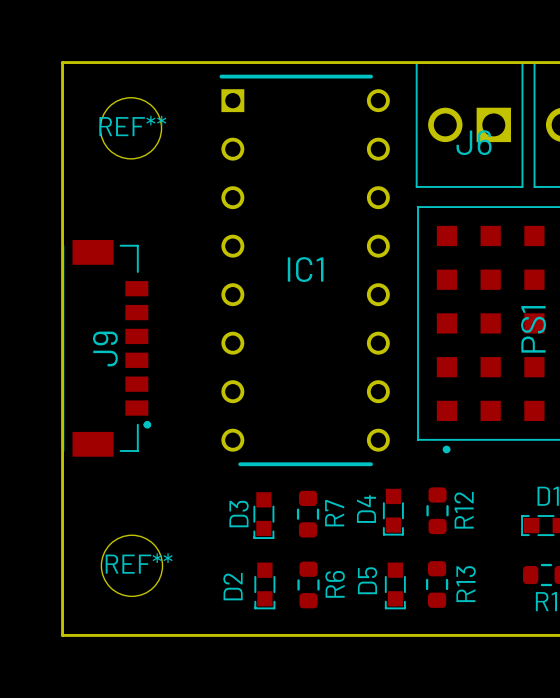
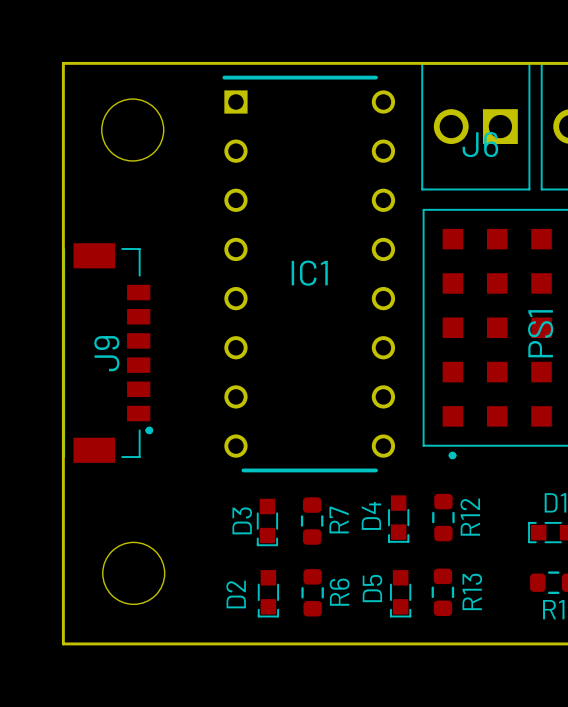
REF** name: REF** (132, 125) -> none
REF** name: REF** (139, 563) -> none

